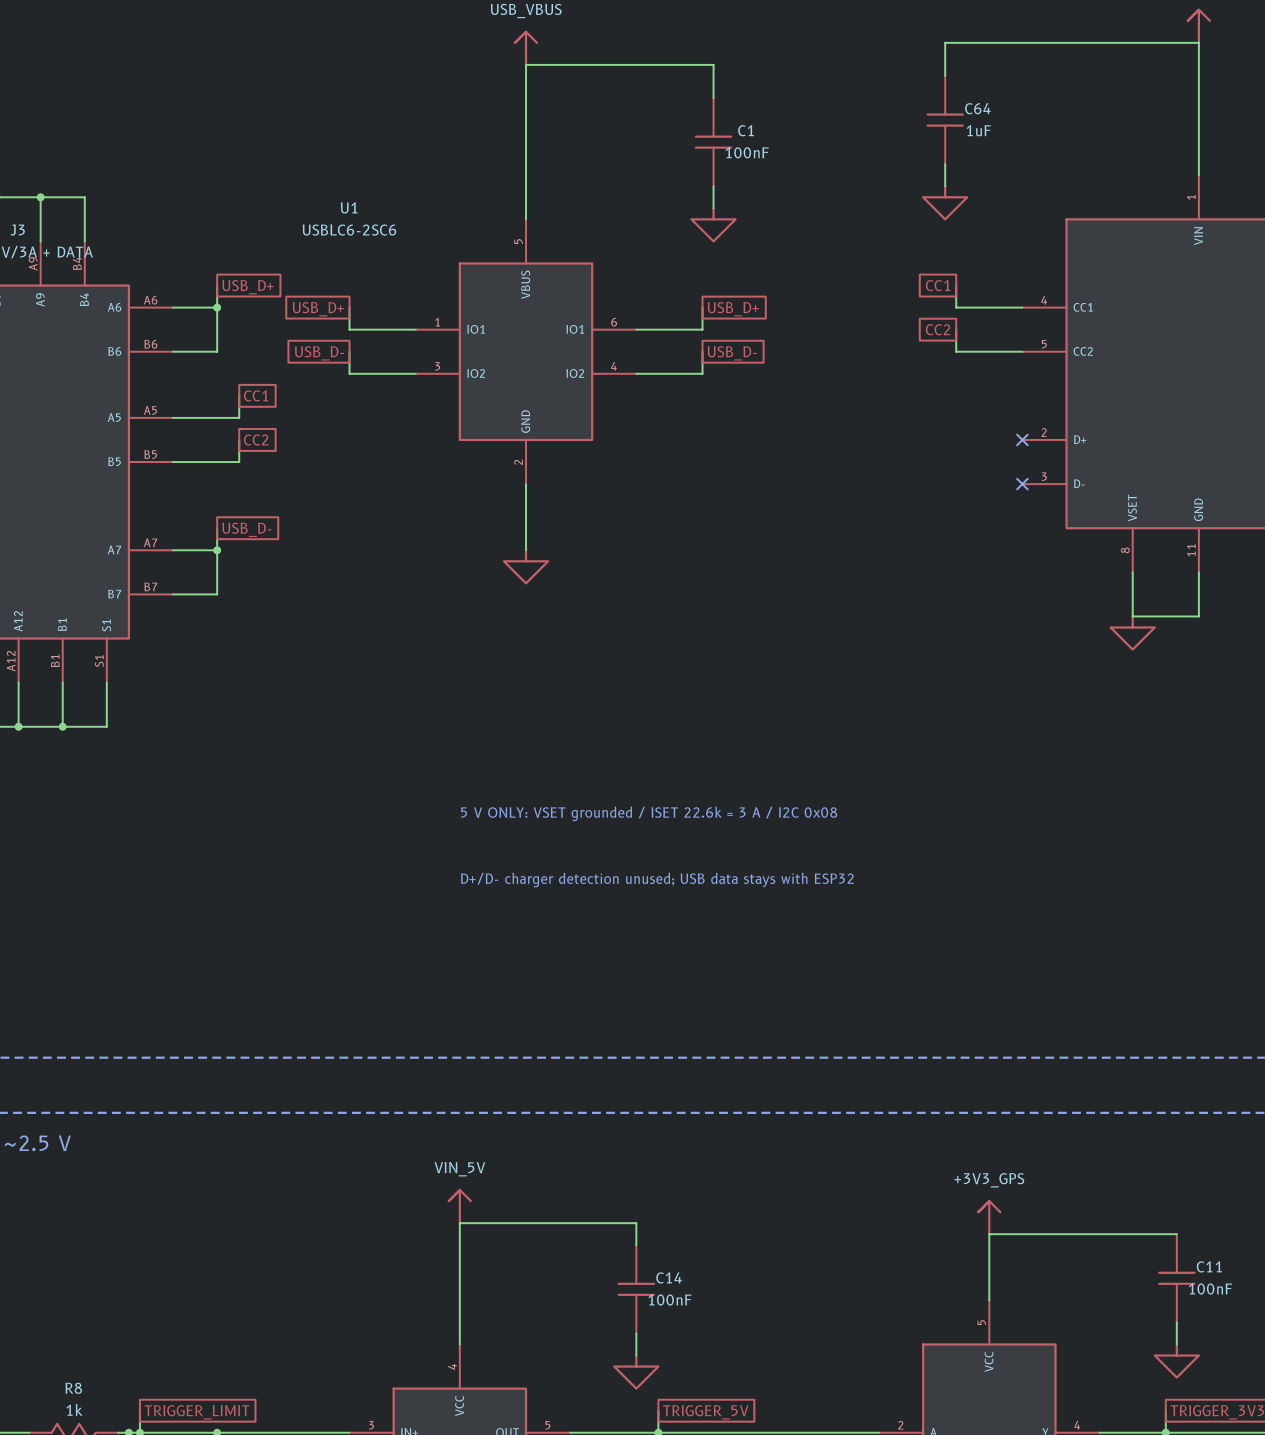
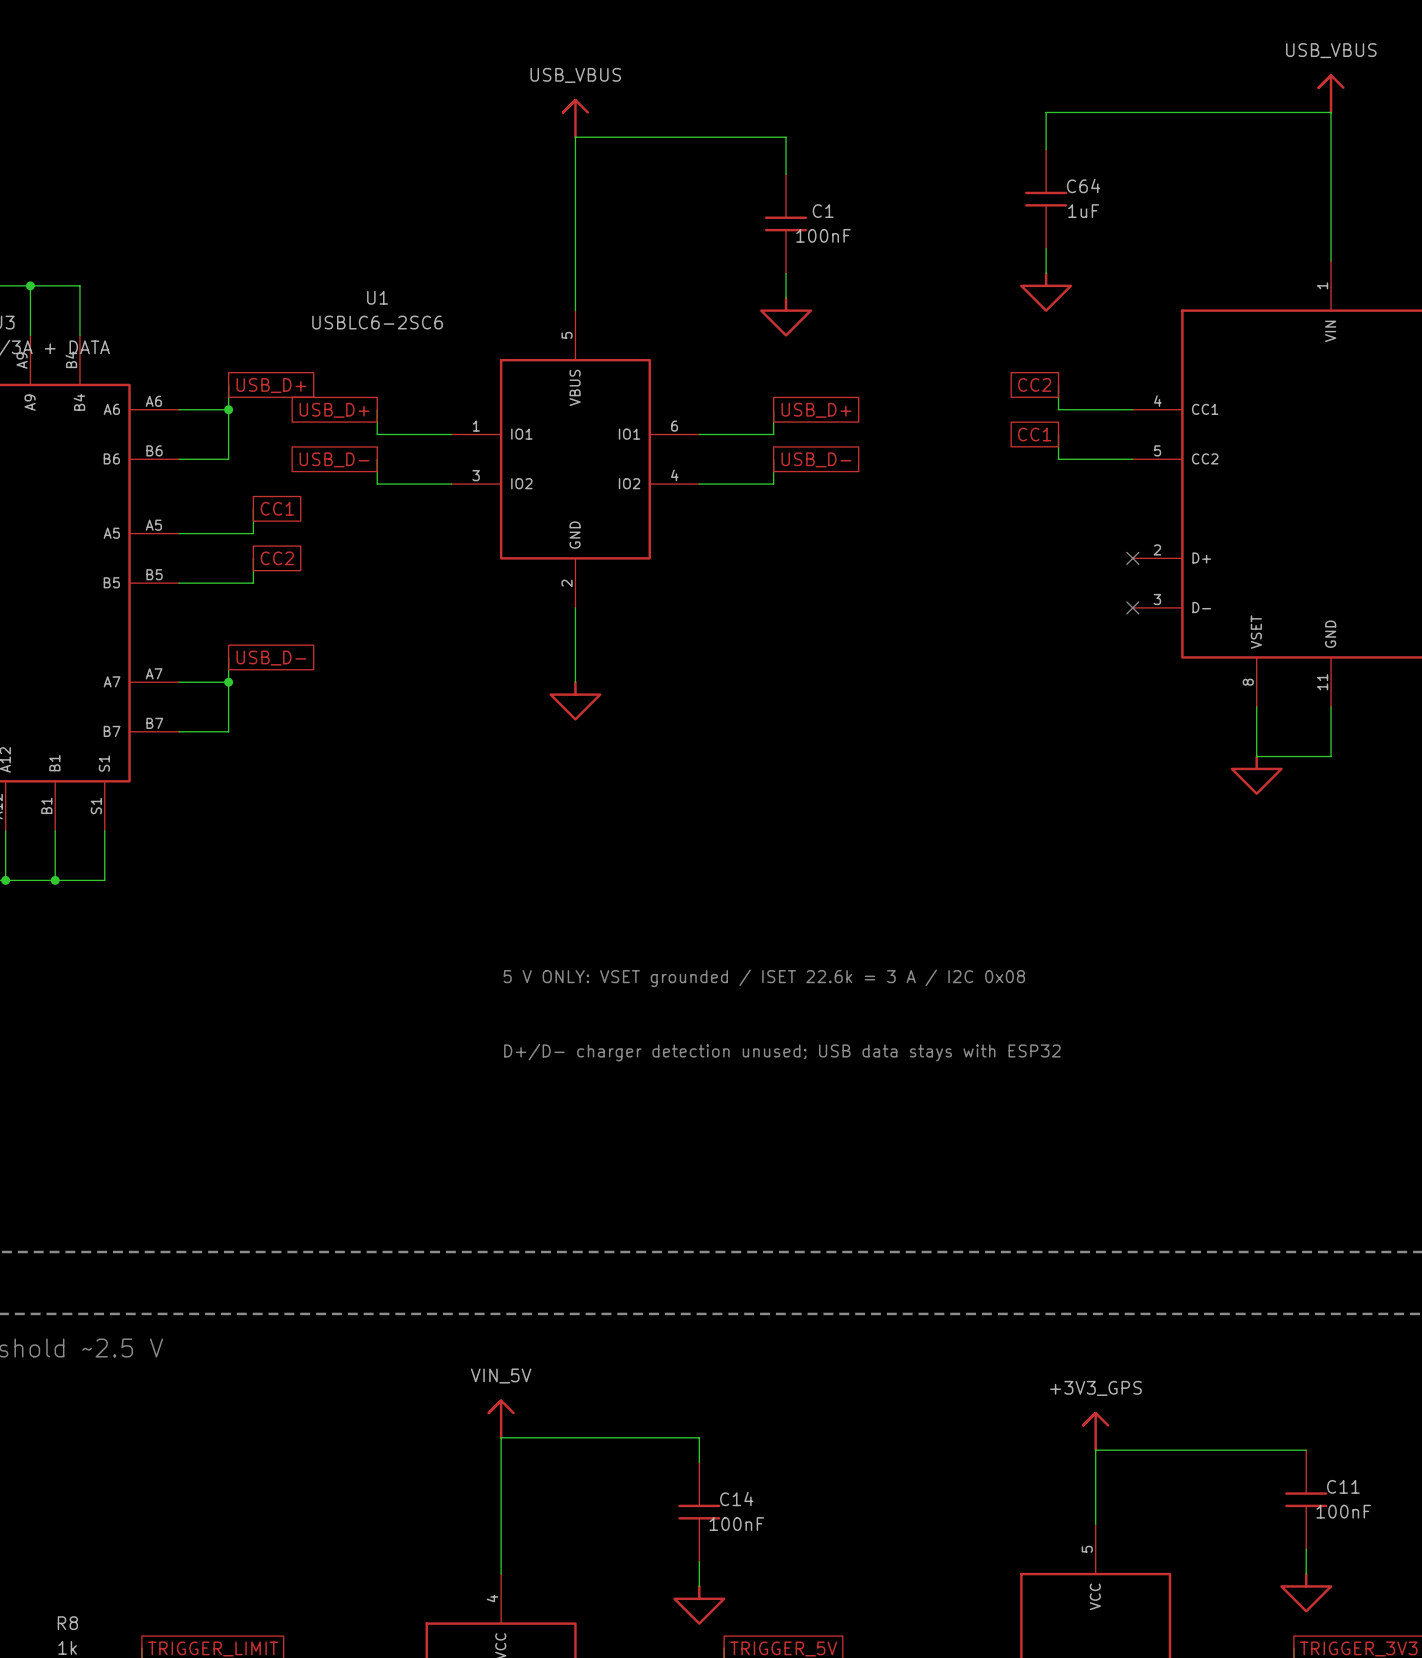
global label: CC1 (938, 285) -> CC2 (1034, 384)
global label: CC2 (938, 329) -> CC1 (1034, 434)

